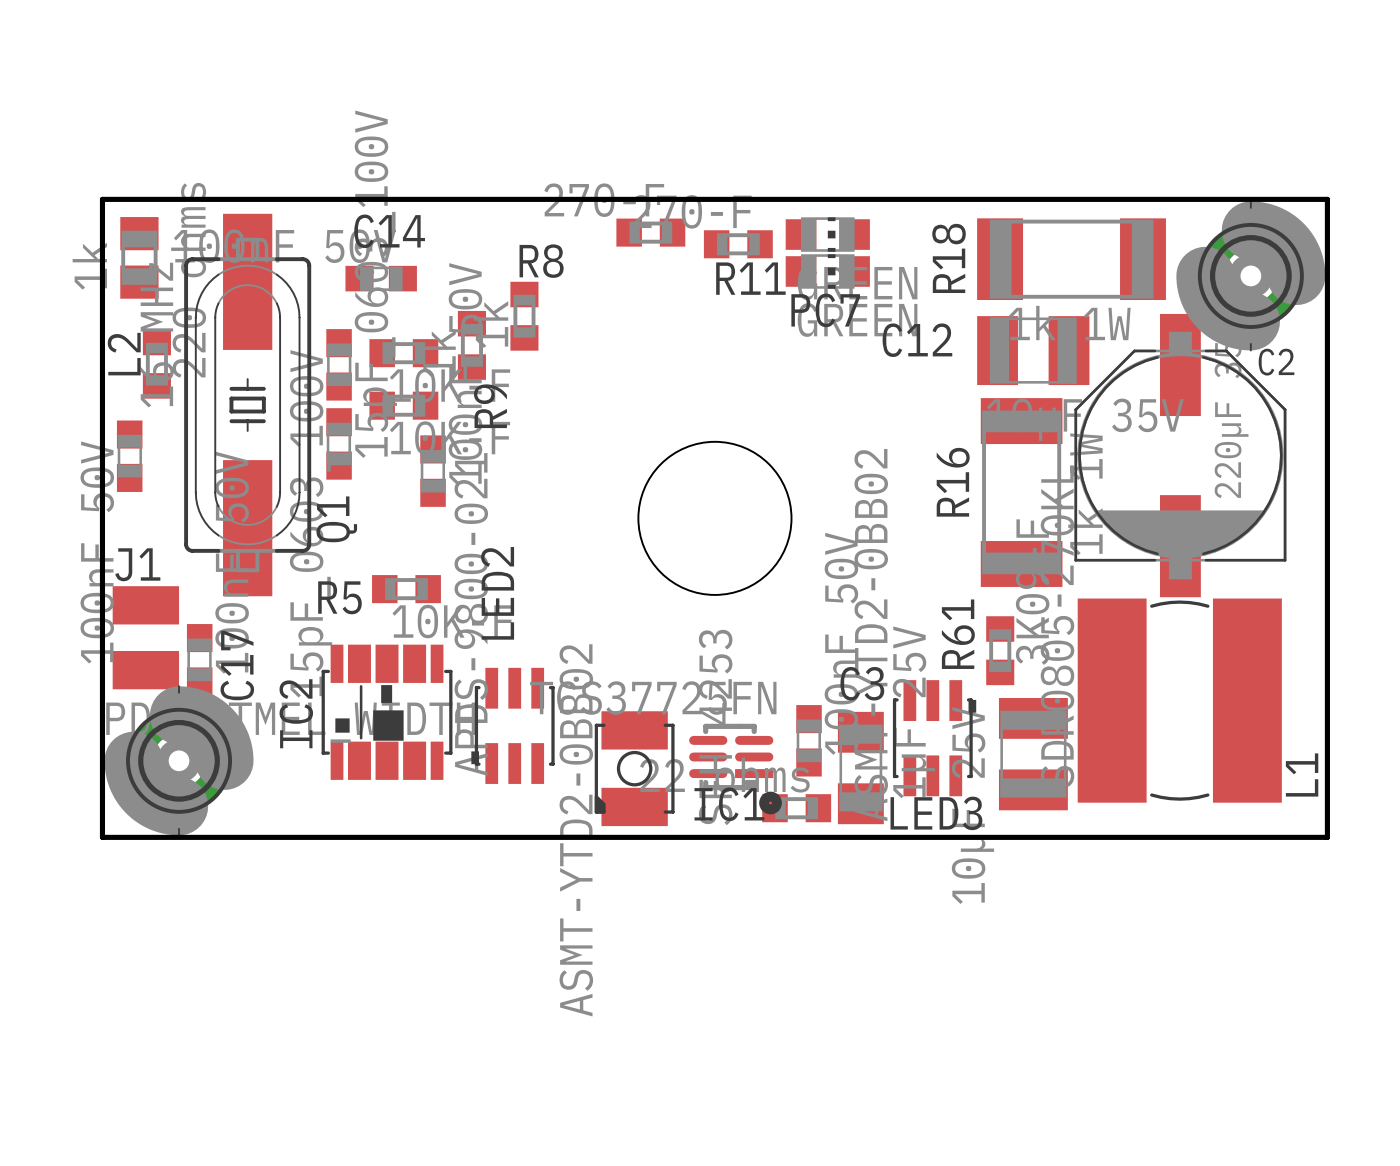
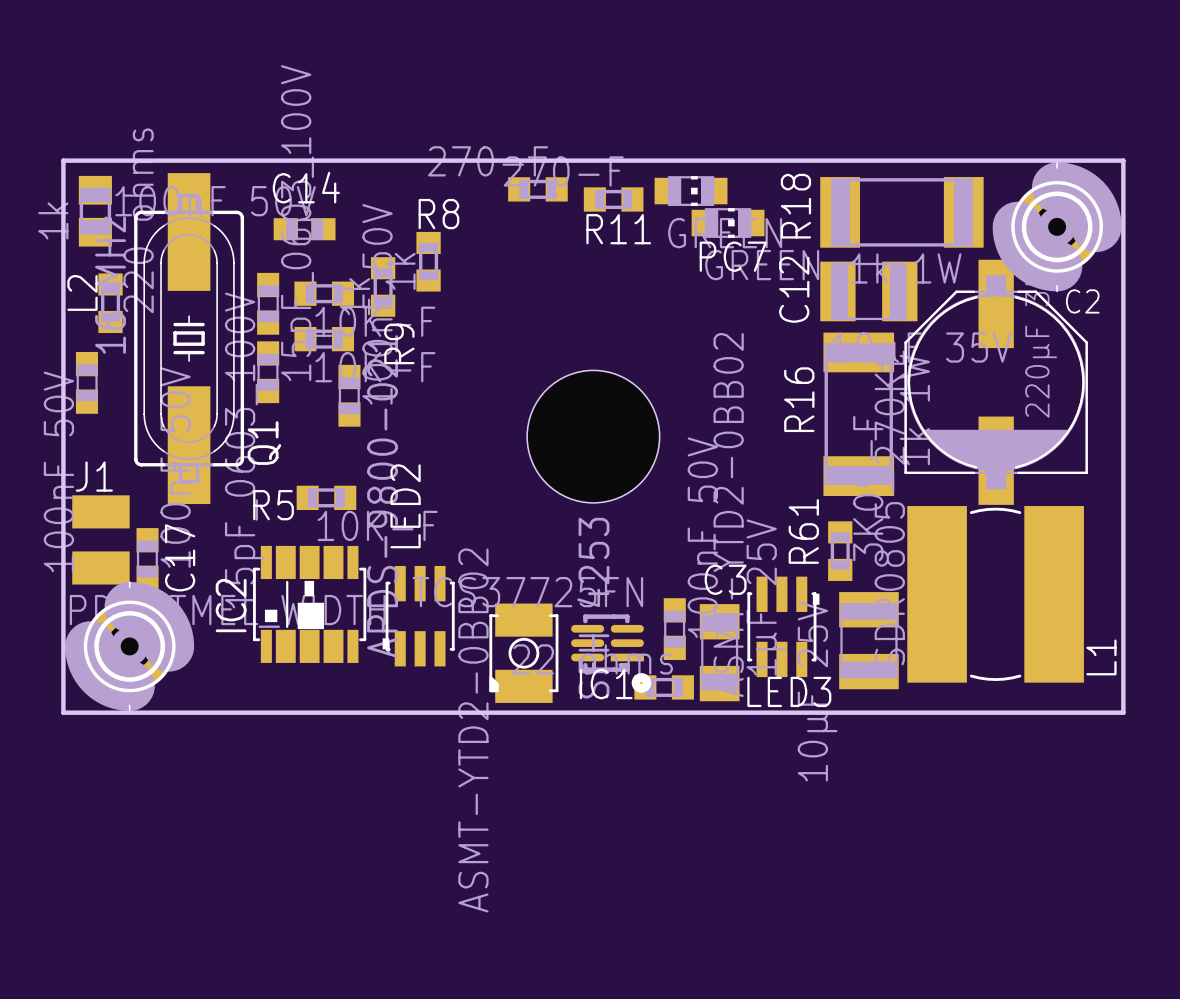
PC7 position: (827, 271) -> (728, 223)
C12 name rotation: 0° (917, 340) -> 90° counterclockwise (794, 289)

